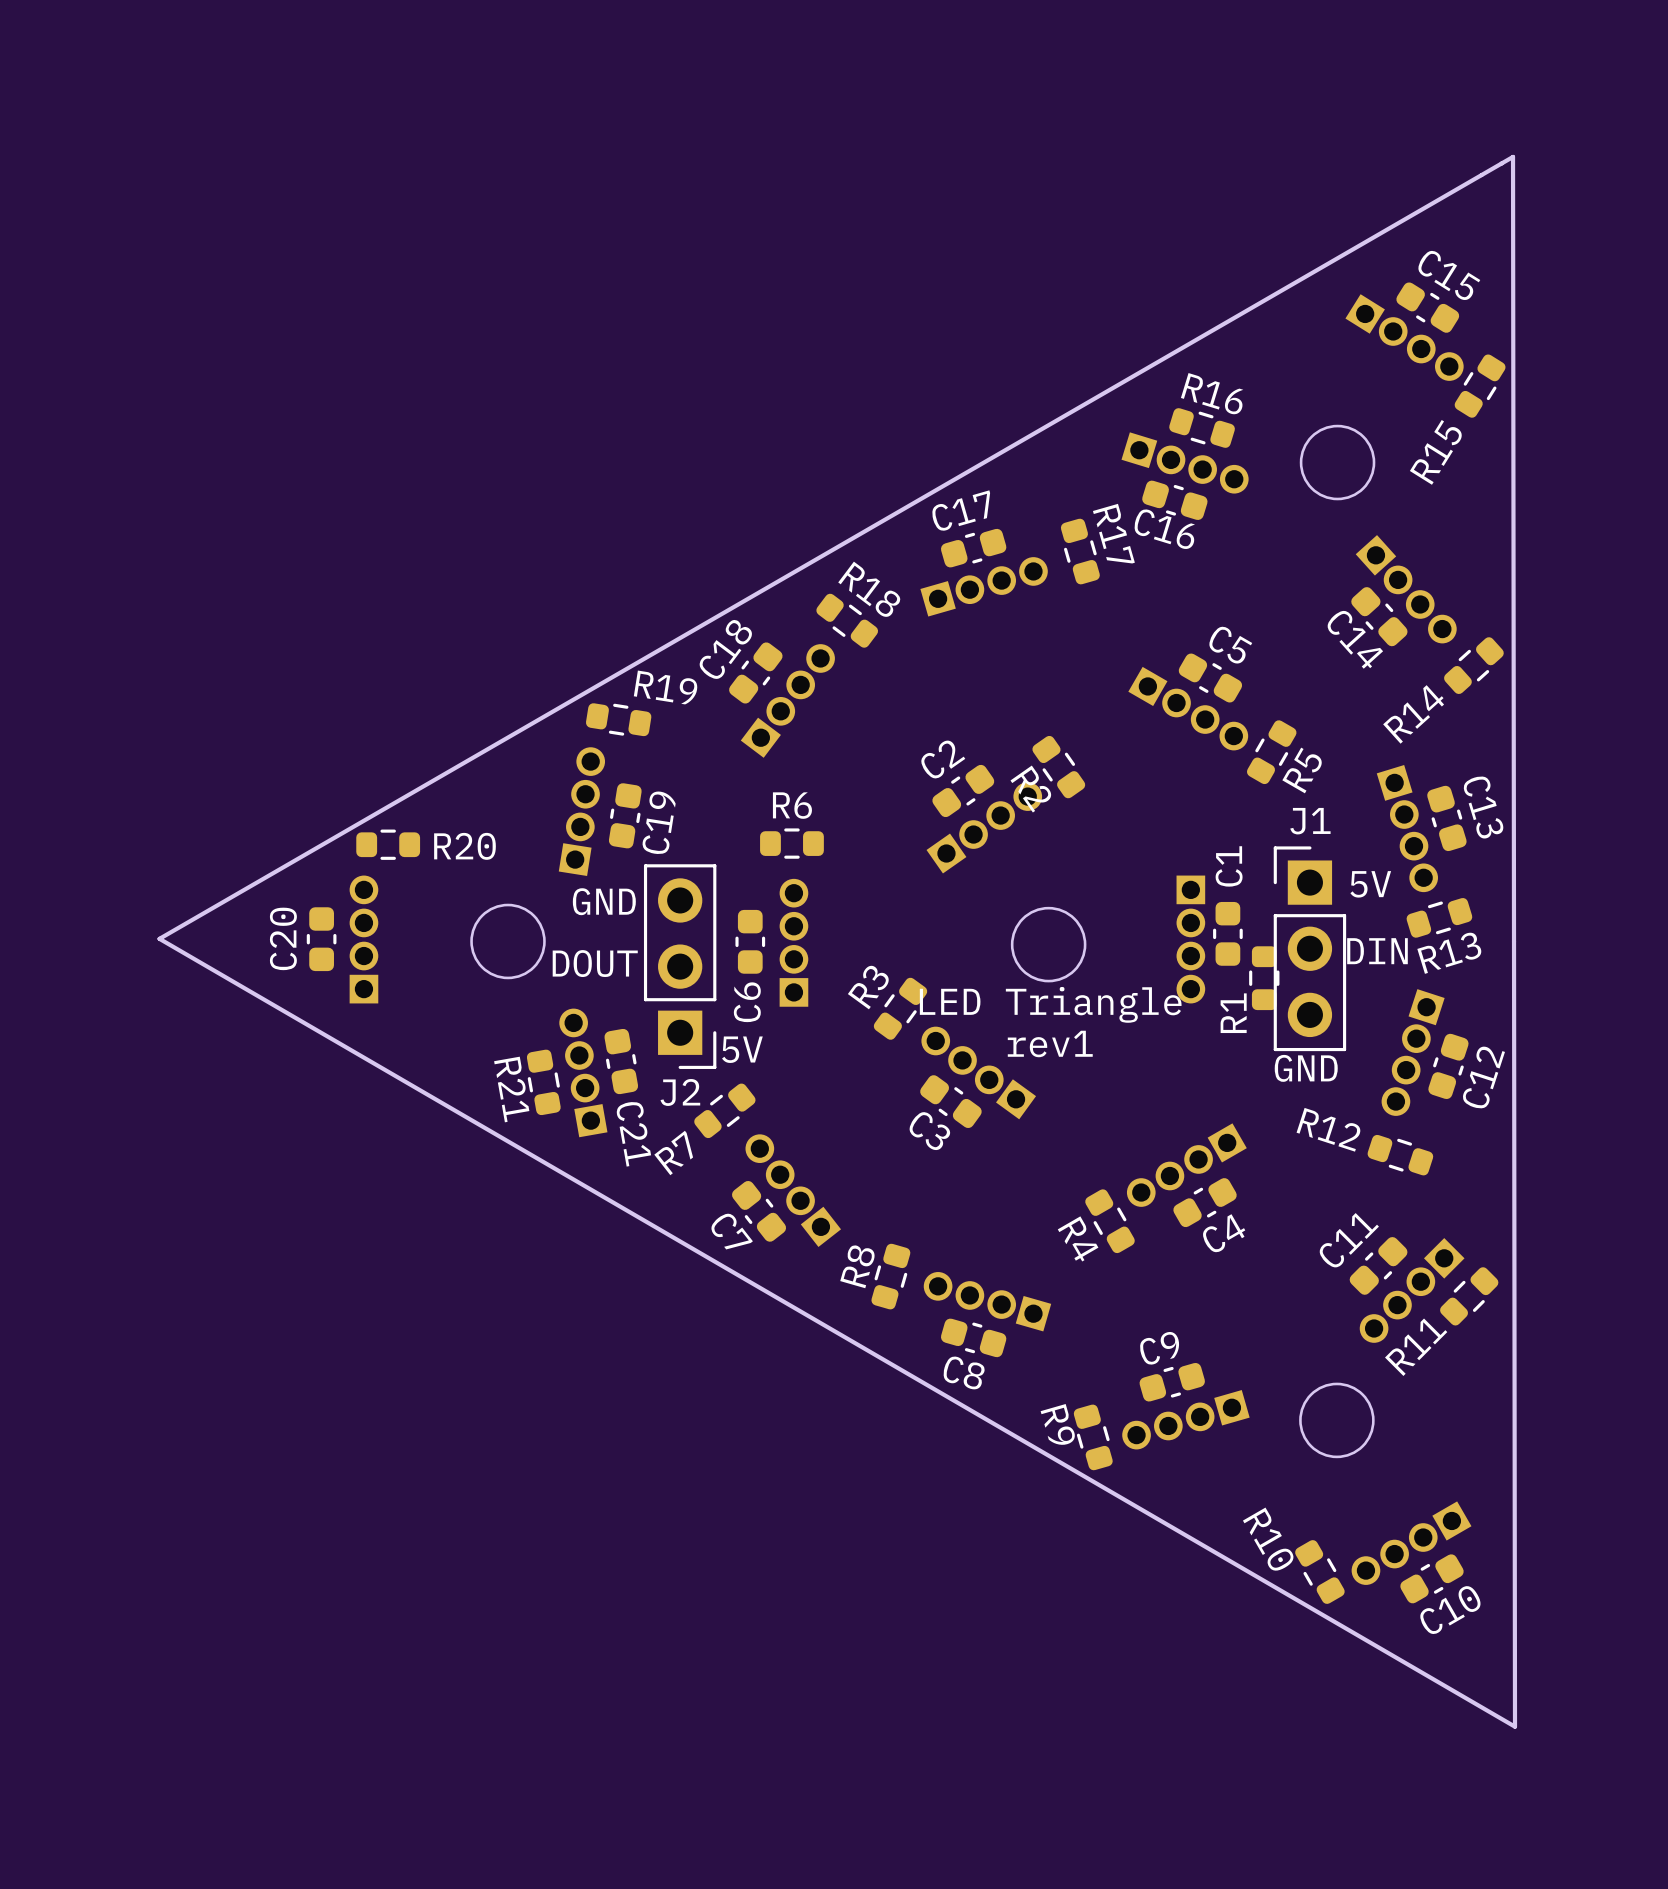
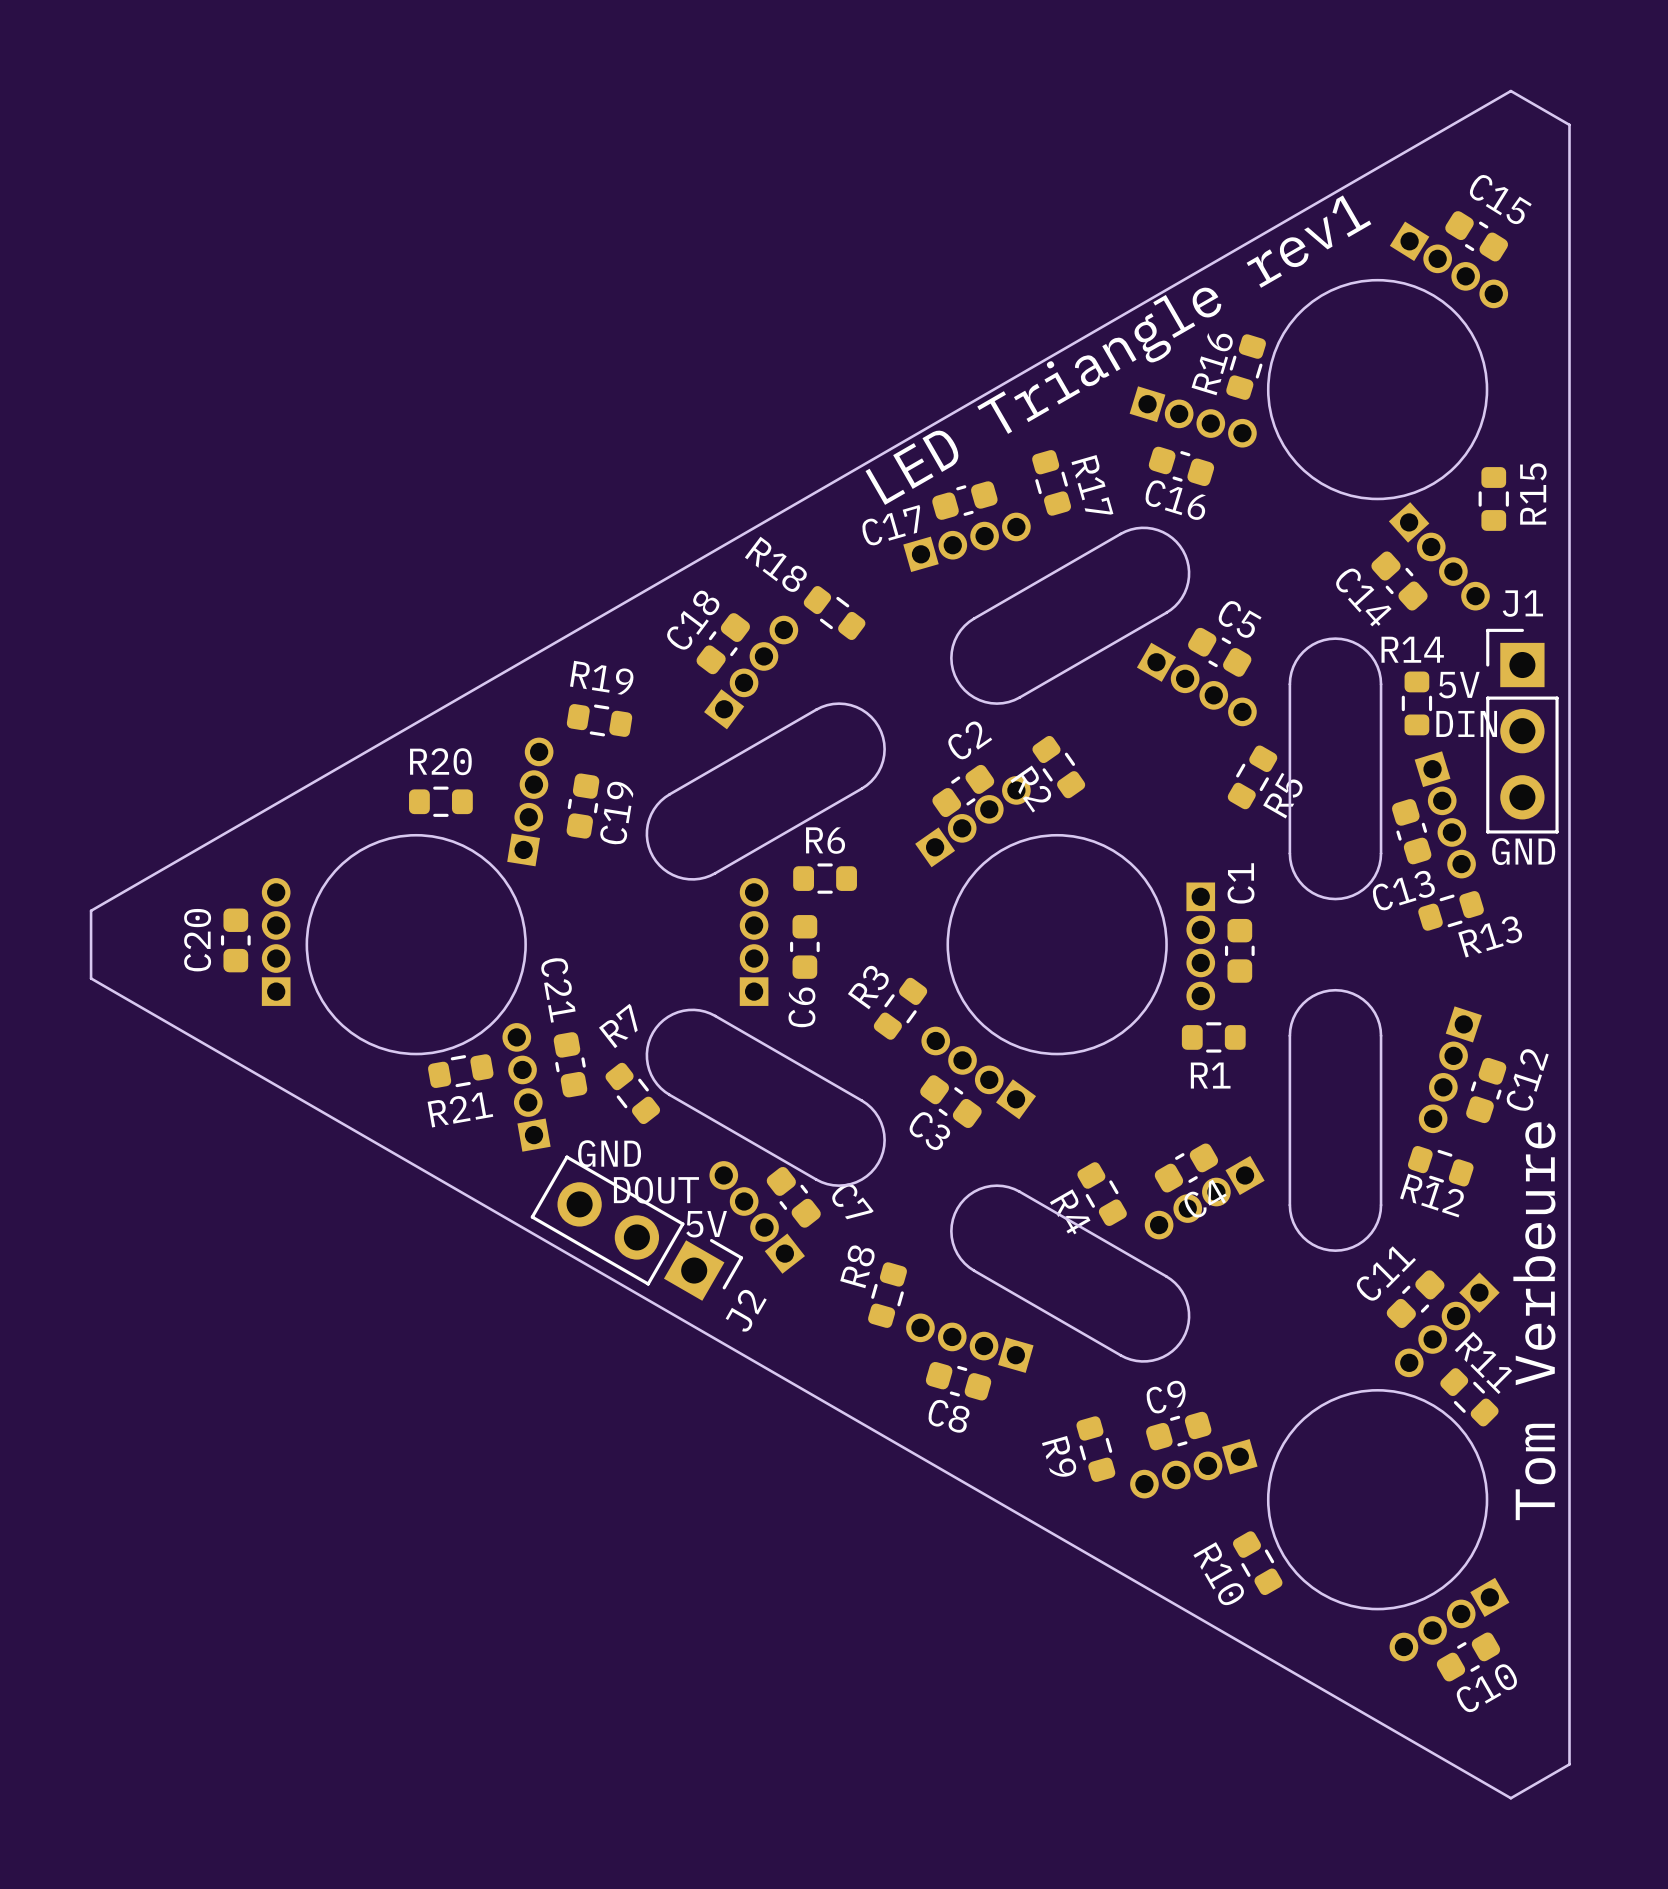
board edge: (1513, 156) (159, 938) (1515, 1726) (1513, 156) -> (1510, 91) (91, 910) (91, 978) (1510, 1798) (1569, 1764) (1569, 124) (1510, 91)
C15 name position: C15 (1449, 275) -> C15 (1500, 199)
round board edge: none -> [1266, 278, 1489, 501]
C15 position: (1427, 307) -> (1476, 236)
part position: (1404, 337) -> (1448, 264)
text: none -> LED Triangle rev1 (1118, 350)
R15 rotation: 0° (1480, 386) -> 32° counterclockwise (1493, 498)
R15 position: (1480, 386) -> (1493, 498)
round board edge: [1299, 424, 1376, 501] -> none
R16 rotation: 0° (1202, 428) -> 90° clockwise (1246, 367)
R16 position: (1202, 428) -> (1246, 367)
R15 name position: R15 (1435, 452) -> R15 (1533, 493)
part position: (1185, 462) -> (1193, 416)
C16 position: (1174, 500) -> (1181, 466)
C17 name position: C17 (960, 510) -> C17 (890, 525)
C16 name position: C16 (1164, 528) -> C16 (1175, 499)
R17 name position: R17 (1113, 533) -> R17 (1092, 484)
board edge: none -> (1120, 533) (964, 625) (954, 640) (951, 658) (954, 675) (964, 690) (974, 697) (990, 703) (1002, 703) (1014, 700) (1175, 606) (1184, 592) (1188, 577) (1187, 560) (1179, 546) (1167, 534) (1152, 528) (1136, 528) (1120, 533)
C17 position: (973, 548) -> (964, 500)
R17 position: (1080, 551) -> (1051, 482)
part position: (984, 586) -> (966, 542)
R18 name position: R18 (869, 589) -> R18 (776, 564)
part position: (1406, 589) -> (1439, 556)
C14 position: (1379, 616) -> (1399, 580)
R18 position: (847, 620) -> (834, 613)
C14 name position: C14 (1354, 639) -> C14 (1363, 597)
R14 rotation: 0° (1473, 665) -> 48° counterclockwise (1416, 703)
R14 position: (1473, 665) -> (1416, 703)
C18 position: (755, 672) -> (723, 643)
C5 position: (1210, 678) -> (1219, 652)
board edge: none -> (1289, 684) (1291, 865) (1299, 881) (1312, 892) (1329, 898) (1347, 897) (1358, 892) (1367, 885) (1374, 876) (1380, 859) (1379, 672) (1371, 656) (1363, 648) (1347, 640) (1329, 639) (1312, 644) (1299, 656) (1291, 672) (1289, 684)
R19 name position: R19 (665, 687) -> R19 (601, 677)
part position: (787, 700) -> (751, 672)
part position: (1188, 708) -> (1196, 684)
board edge: none -> (816, 709) (660, 800) (651, 814) (647, 830) (650, 851) (659, 865) (668, 872) (683, 878) (699, 878) (710, 875) (871, 781) (878, 771) (884, 755) (883, 737) (875, 721) (861, 709) (850, 705) (833, 704) (816, 709)
R14 name position: R14 (1413, 714) -> R14 (1412, 649)
R19 position: (618, 719) -> (599, 720)
R5 position: (1271, 752) -> (1252, 777)
C2 name position: C2 (943, 759) -> C2 (970, 740)
C13 name rotation: 0° (1483, 807) -> 90° counterclockwise (1403, 891)
part position: (581, 811) -> (530, 801)
C19 position: (625, 815) -> (582, 806)
C13 position: (1446, 818) -> (1411, 831)
part position: (984, 827) -> (972, 821)
part position: (1407, 828) -> (1445, 814)
round board edge: none -> [305, 833, 527, 1056]
R6 position: (791, 843) -> (825, 878)
R20 position: (388, 844) -> (440, 801)
R20 name position: R20 (464, 846) -> R20 (440, 761)
text position: 5V (1370, 884) -> 5V (1459, 685)
text position: GND (604, 901) -> GND (609, 1153)
round board edge: [470, 903, 546, 980] -> none
round board edge size: [1010, 906, 1087, 983] -> [946, 833, 1168, 1056]
R13 position: (1439, 917) -> (1451, 910)
C1 position: (1227, 933) -> (1239, 950)
C20 position: (321, 939) -> (235, 940)
part position: (363, 939) -> (276, 941)
part position: (1190, 939) -> (1200, 946)
C6 position: (750, 941) -> (804, 946)
part position: (793, 942) -> (754, 941)
J1 position: (1309, 948) -> (1522, 731)
text position: DIN (1377, 951) -> DIN (1466, 723)
R13 name position: R13 (1449, 953) -> R13 (1490, 936)
text position: DOUT (595, 963) -> DOUT (656, 1190)
J2 rotation: 0° (680, 966) -> 60° counterclockwise (636, 1228)
J2 position: (680, 966) -> (636, 1228)
R1 rotation: 0° (1264, 978) -> 90° clockwise (1213, 1037)
R1 position: (1264, 978) -> (1213, 1037)
text: LED Triangle (1050, 1004) -> none
board edge: none -> (715, 1015) (871, 1107) (881, 1122) (884, 1140) (881, 1157) (871, 1172) (856, 1182) (845, 1185) (833, 1185) (821, 1182) (660, 1088) (651, 1074) (647, 1059) (648, 1042) (656, 1028) (668, 1016) (683, 1010) (699, 1010) (715, 1015)
board edge: none -> (1289, 1035) (1291, 1216) (1299, 1232) (1312, 1244) (1329, 1250) (1347, 1249) (1358, 1244) (1371, 1232) (1377, 1222) (1380, 1211) (1379, 1024) (1371, 1008) (1363, 999) (1347, 991) (1329, 990) (1312, 996) (1299, 1008) (1291, 1024) (1289, 1035)
text: rev1 (1050, 1043) -> none
text position: 5V (742, 1049) -> 5V (706, 1224)
part position: (1413, 1052) -> (1450, 1069)
C21 position: (621, 1061) -> (570, 1064)
C12 position: (1448, 1066) -> (1486, 1090)
text position: GND (1306, 1068) -> GND (1523, 851)
part position: (583, 1072) -> (526, 1087)
C12 name position: C12 (1483, 1077) -> C12 (1527, 1080)
R21 rotation: 0° (543, 1082) -> 90° clockwise (460, 1071)
R21 position: (543, 1082) -> (460, 1071)
R7 rotation: 0° (724, 1110) -> 90° clockwise (632, 1093)
R7 position: (724, 1110) -> (632, 1093)
R12 name position: R12 (1328, 1129) -> R12 (1431, 1195)
C21 name position: C21 (633, 1133) -> C21 (558, 990)
R12 position: (1400, 1155) -> (1440, 1166)
part position: (1186, 1165) -> (1204, 1197)
part position: (793, 1190) -> (757, 1217)
board edge: none -> (1019, 1191) (1175, 1283) (1186, 1301) (1189, 1317) (1185, 1333) (1176, 1347) (1163, 1357) (1152, 1360) (1141, 1361) (1125, 1357) (964, 1263) (954, 1248) (951, 1231) (954, 1213) (960, 1203) (974, 1191) (985, 1187) (1002, 1186) (1019, 1191)
C4 position: (1205, 1202) -> (1186, 1167)
C7 position: (759, 1211) -> (793, 1197)
R4 position: (1109, 1221) -> (1102, 1194)
C7 name position: C7 (731, 1231) -> C7 (852, 1201)
C11 position: (1378, 1265) -> (1415, 1299)
R8 position: (890, 1276) -> (887, 1295)
part position: (1412, 1290) -> (1447, 1324)
R11 rotation: 0° (1469, 1296) -> 90° clockwise (1469, 1397)
R11 position: (1469, 1296) -> (1469, 1397)
part position: (987, 1301) -> (969, 1343)
text: none -> Tom Verbeure (1534, 1321)
C8 position: (973, 1337) -> (958, 1381)
R11 name position: R11 (1416, 1347) -> R11 (1483, 1362)
C9 position: (1172, 1382) -> (1178, 1431)
round board edge: [1299, 1382, 1375, 1459] -> none
round board edge: none -> [1266, 1389, 1489, 1611]
part position: (1185, 1419) -> (1193, 1468)
R9 name position: R9 (1057, 1424) -> R9 (1059, 1456)
R9 position: (1093, 1437) -> (1095, 1449)
R10 name position: R10 (1268, 1539) -> R10 (1218, 1573)
part position: (1411, 1543) -> (1449, 1619)
R10 position: (1319, 1572) -> (1257, 1563)
C10 position: (1432, 1578) -> (1468, 1656)

